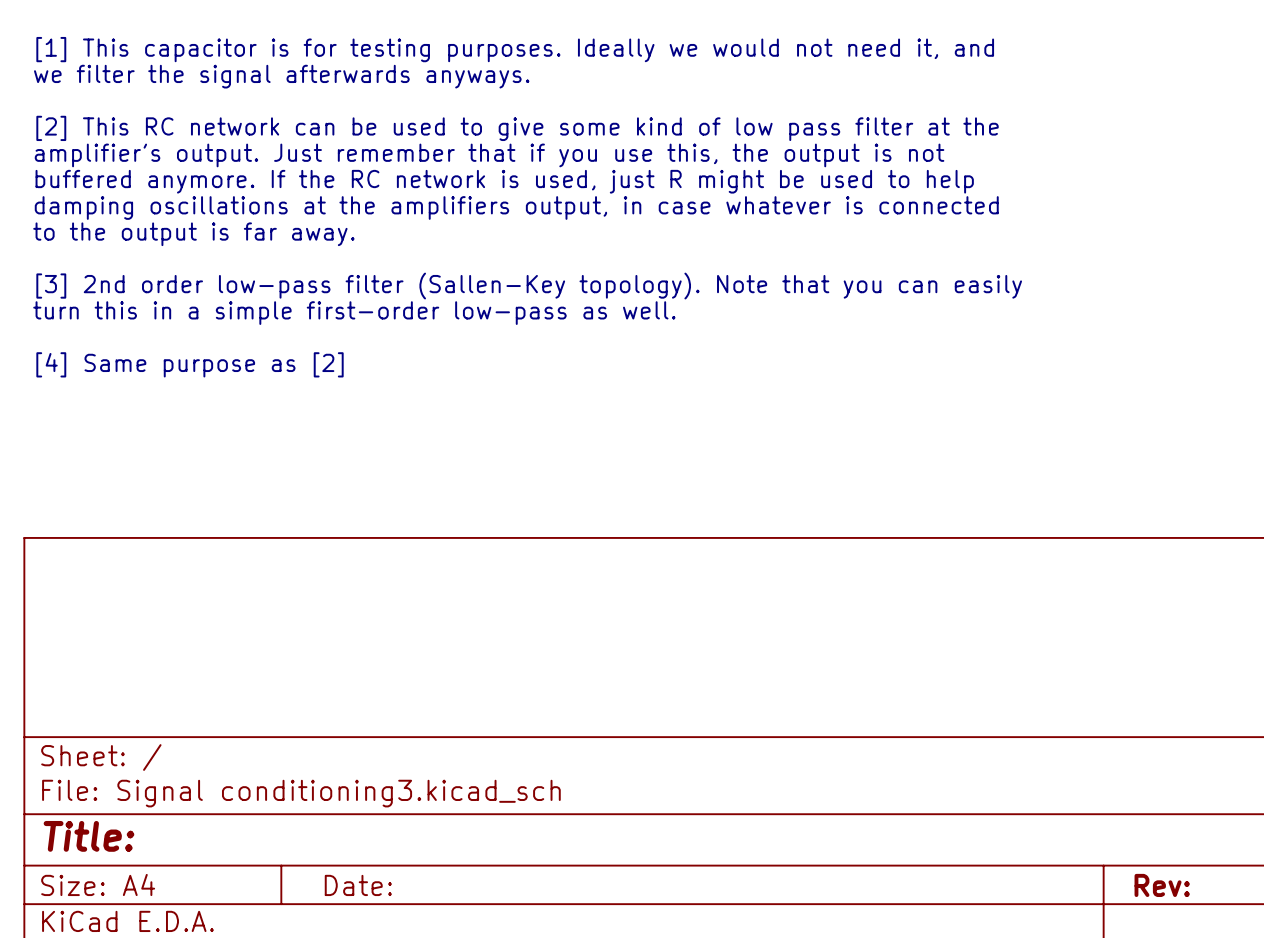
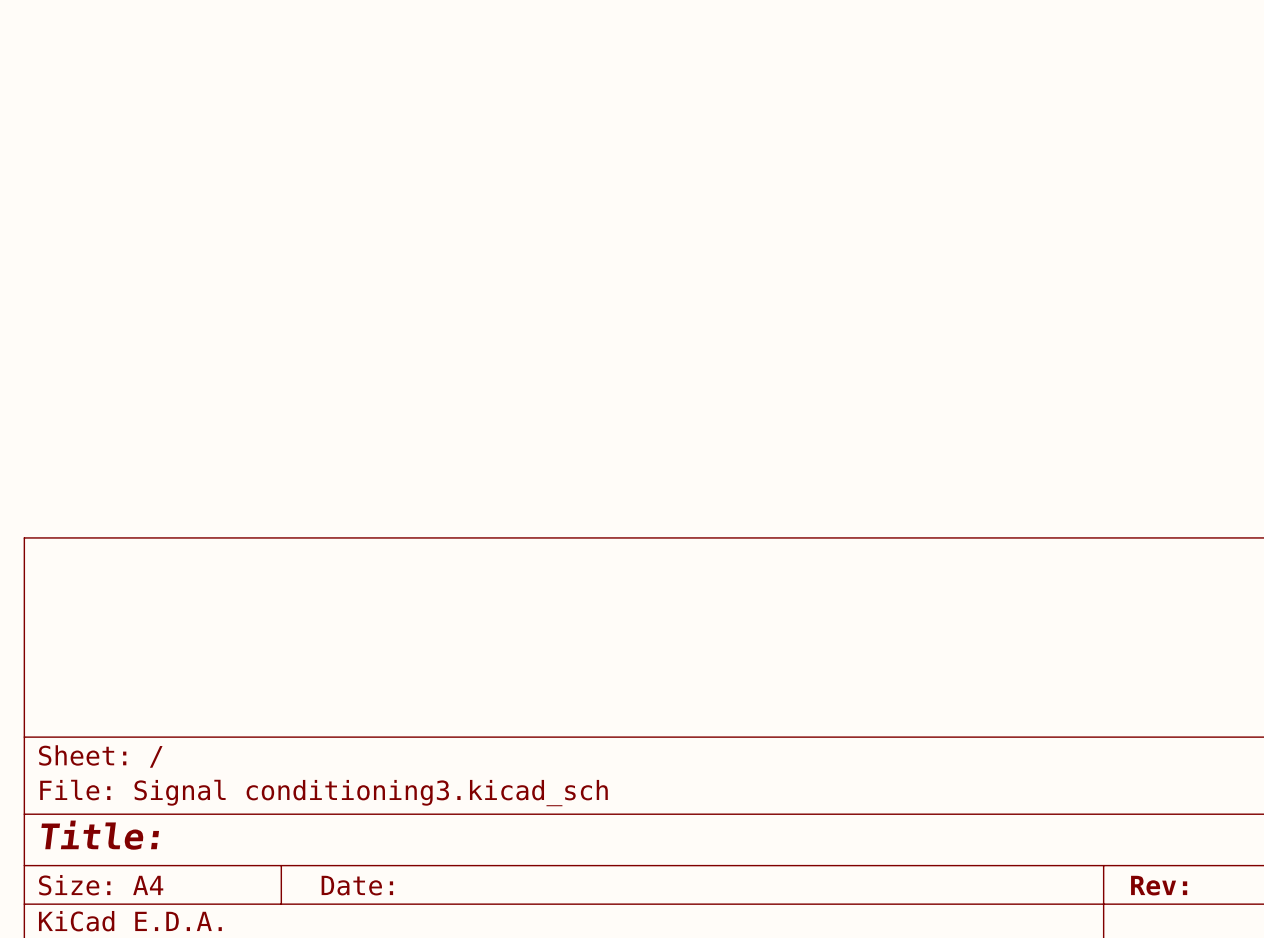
text: [1] This capacitor is for testing purposes. Ideally we would not need it, and (515, 49) -> none
text: we filter the signal afterwards anyways. (281, 76) -> none
text: [2] This RC network can be used to give some kind of low pass filter at the (517, 128) -> none
text: amplifier's output. Just remember that if you use this, the output is not (489, 155) -> none
text: buffered anymore. If the RC network is used, just R might be used to help (504, 181) -> none
text: damping oscillations at the amplifiers output, in case whatever is connected (516, 207) -> none
text: to the output is far away. (193, 234) -> none
text: [3] 2nd order low-pass filter (Sallen-Key topology). Note that you can easily (529, 286) -> none
text: turn this in a simple first-order low-pass as well. (354, 313) -> none
text: [4] Same purpose as [2] (190, 364) -> none

